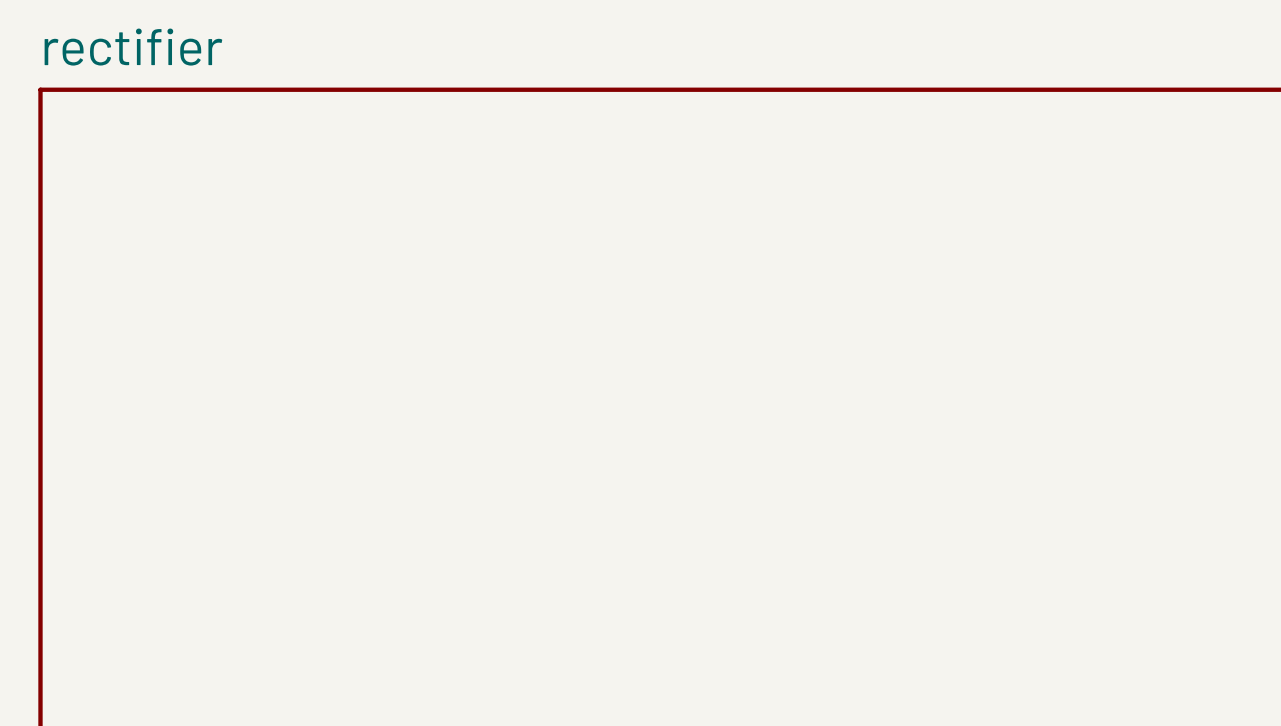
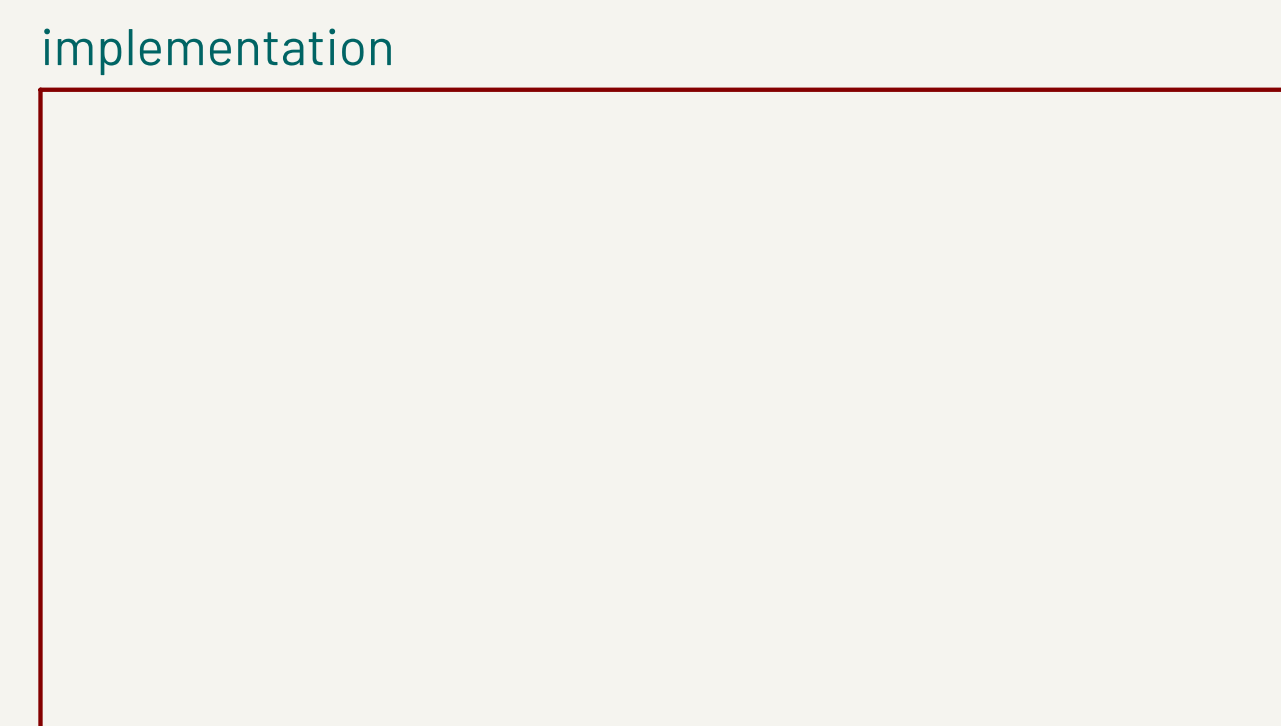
sheet rectifier name: rectifier (133, 47) -> implementation (217, 51)

